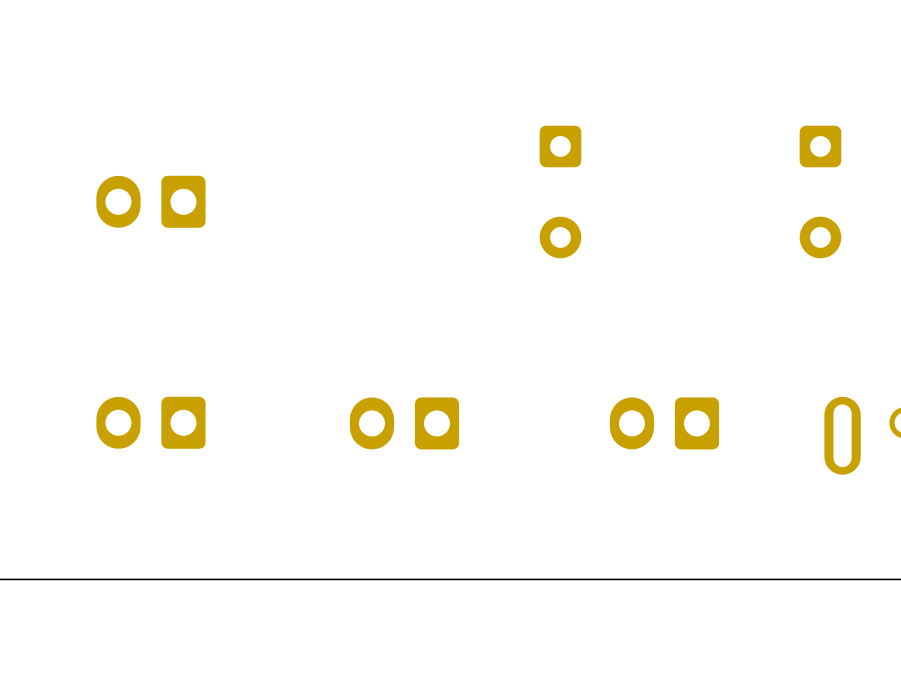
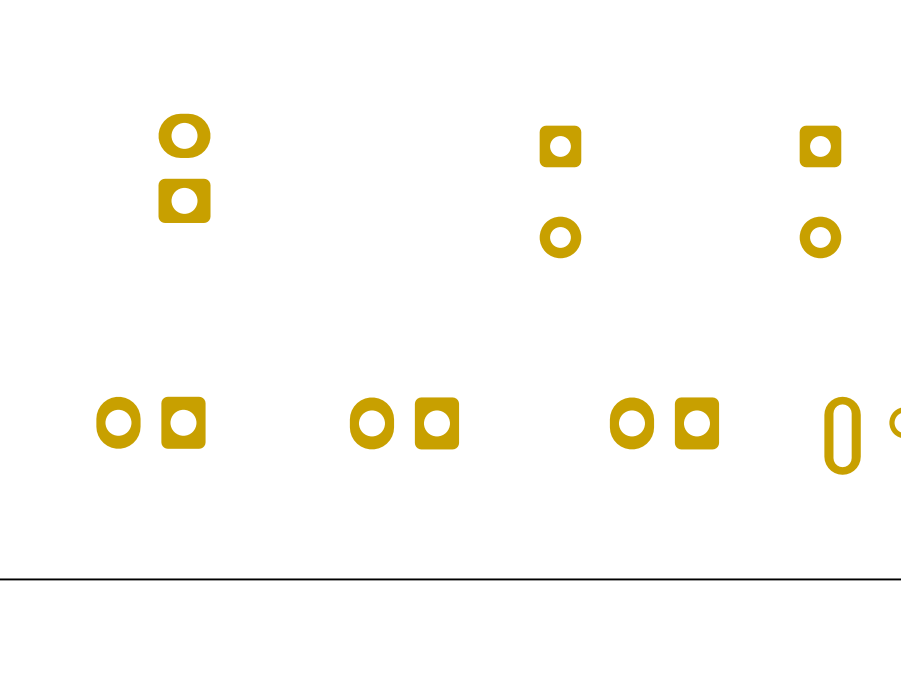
part rotation: 0° (150, 201) -> 90° clockwise (184, 168)

